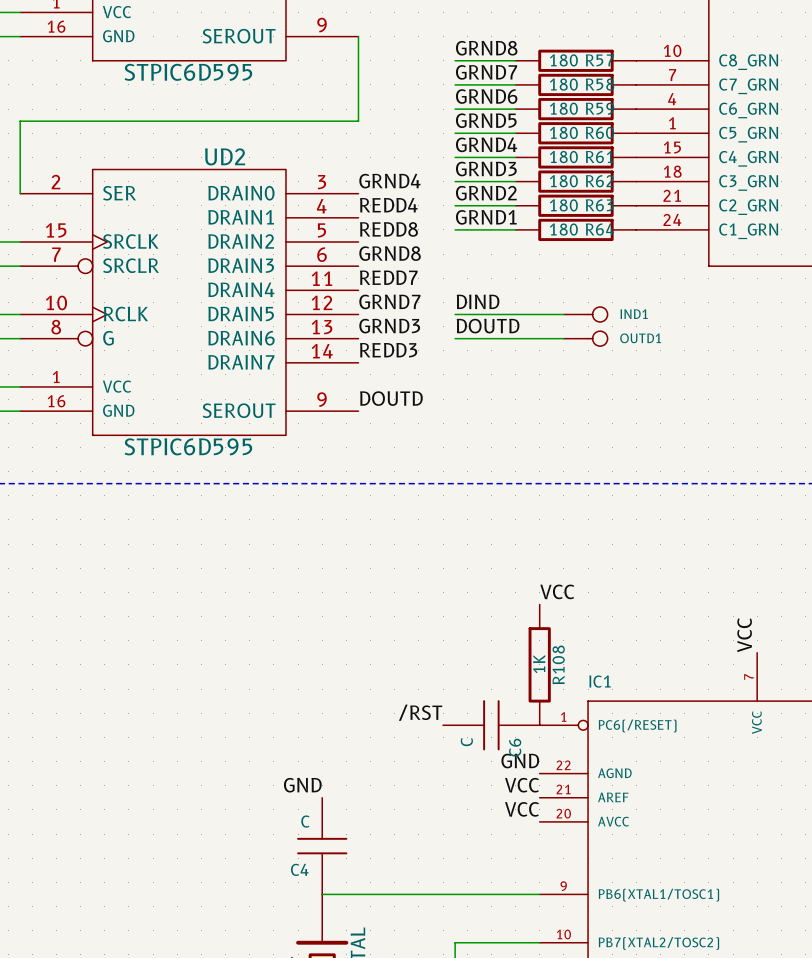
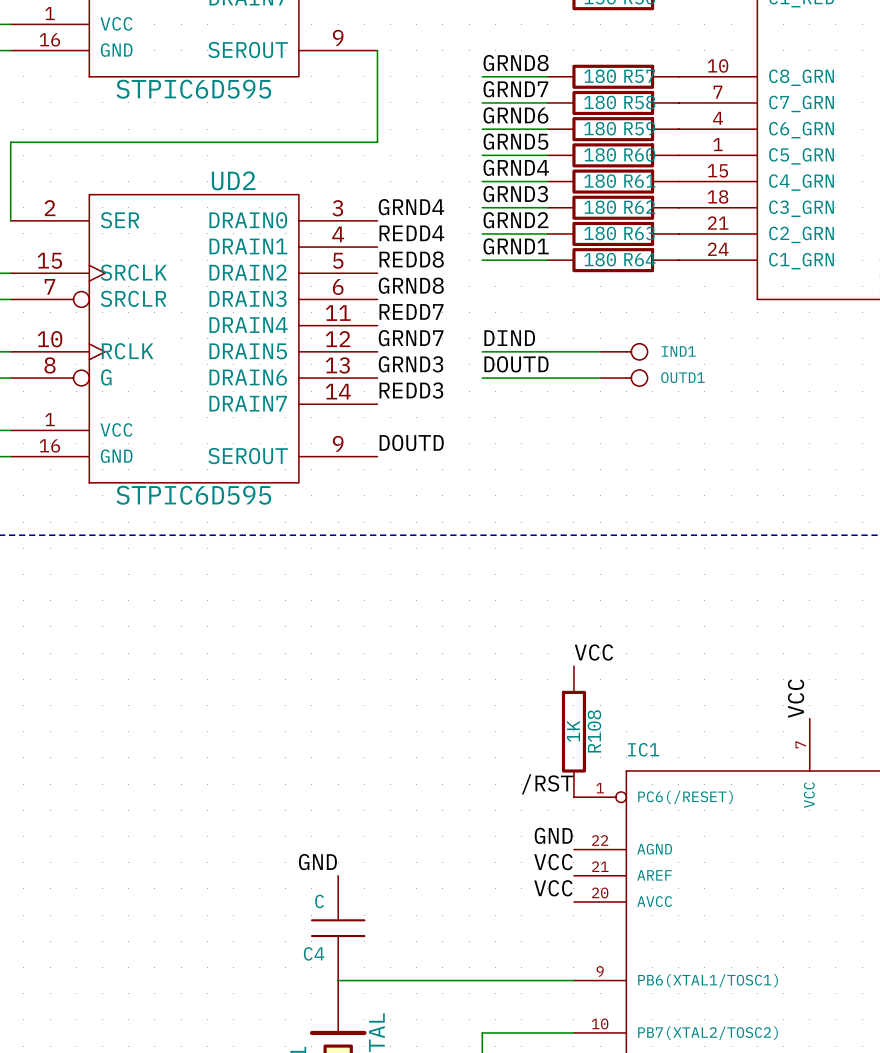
label position: /RST (420, 712) -> /RST (547, 784)
C6: C (491, 725) -> none

